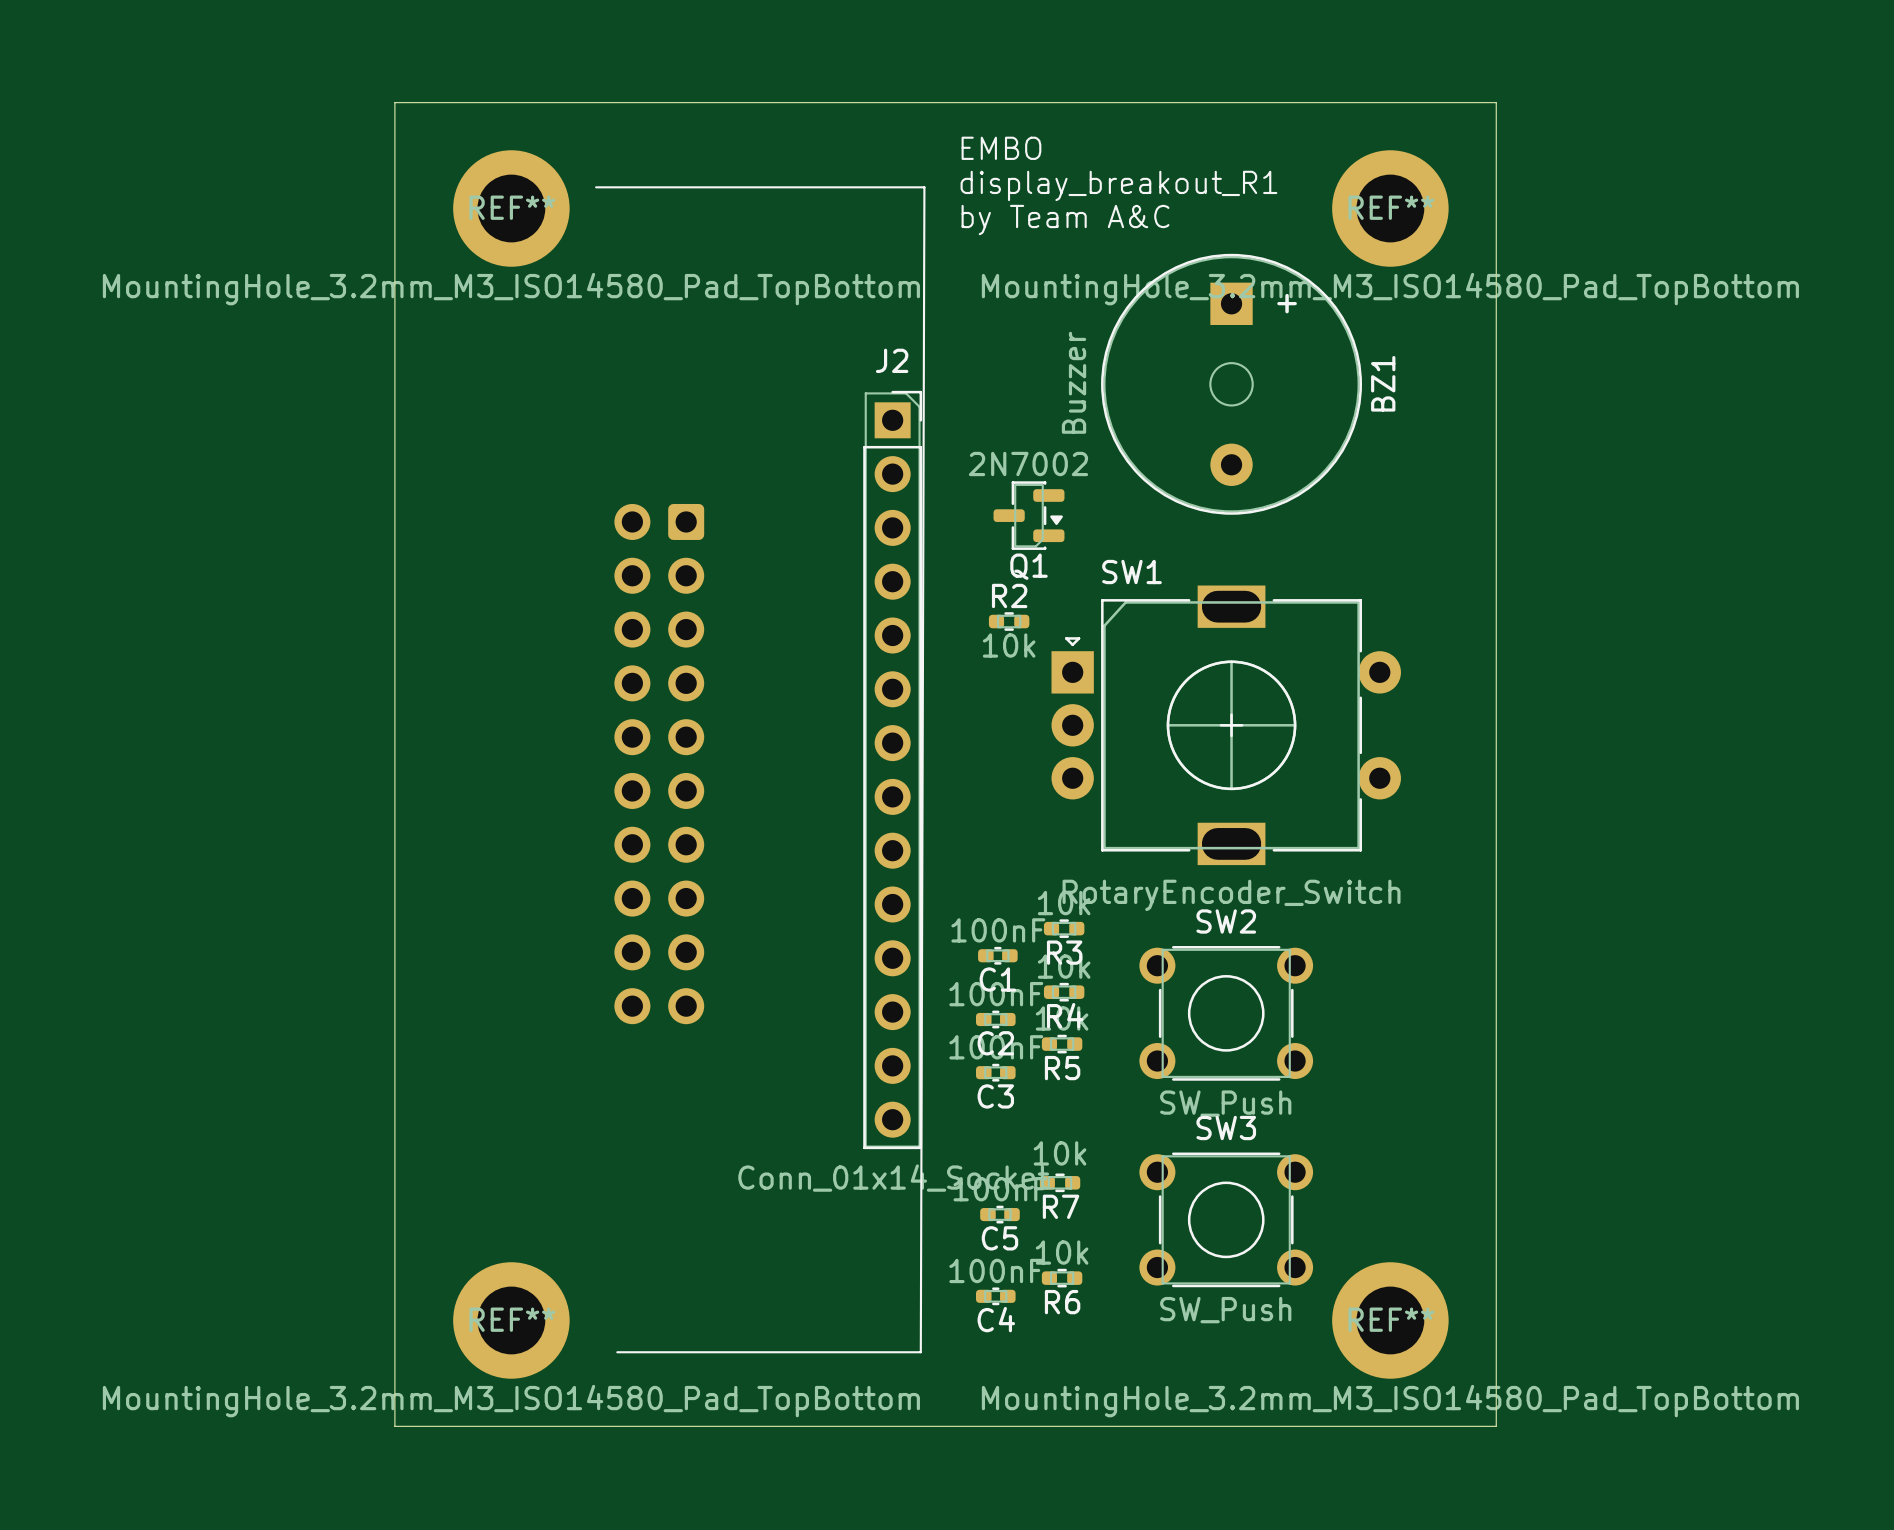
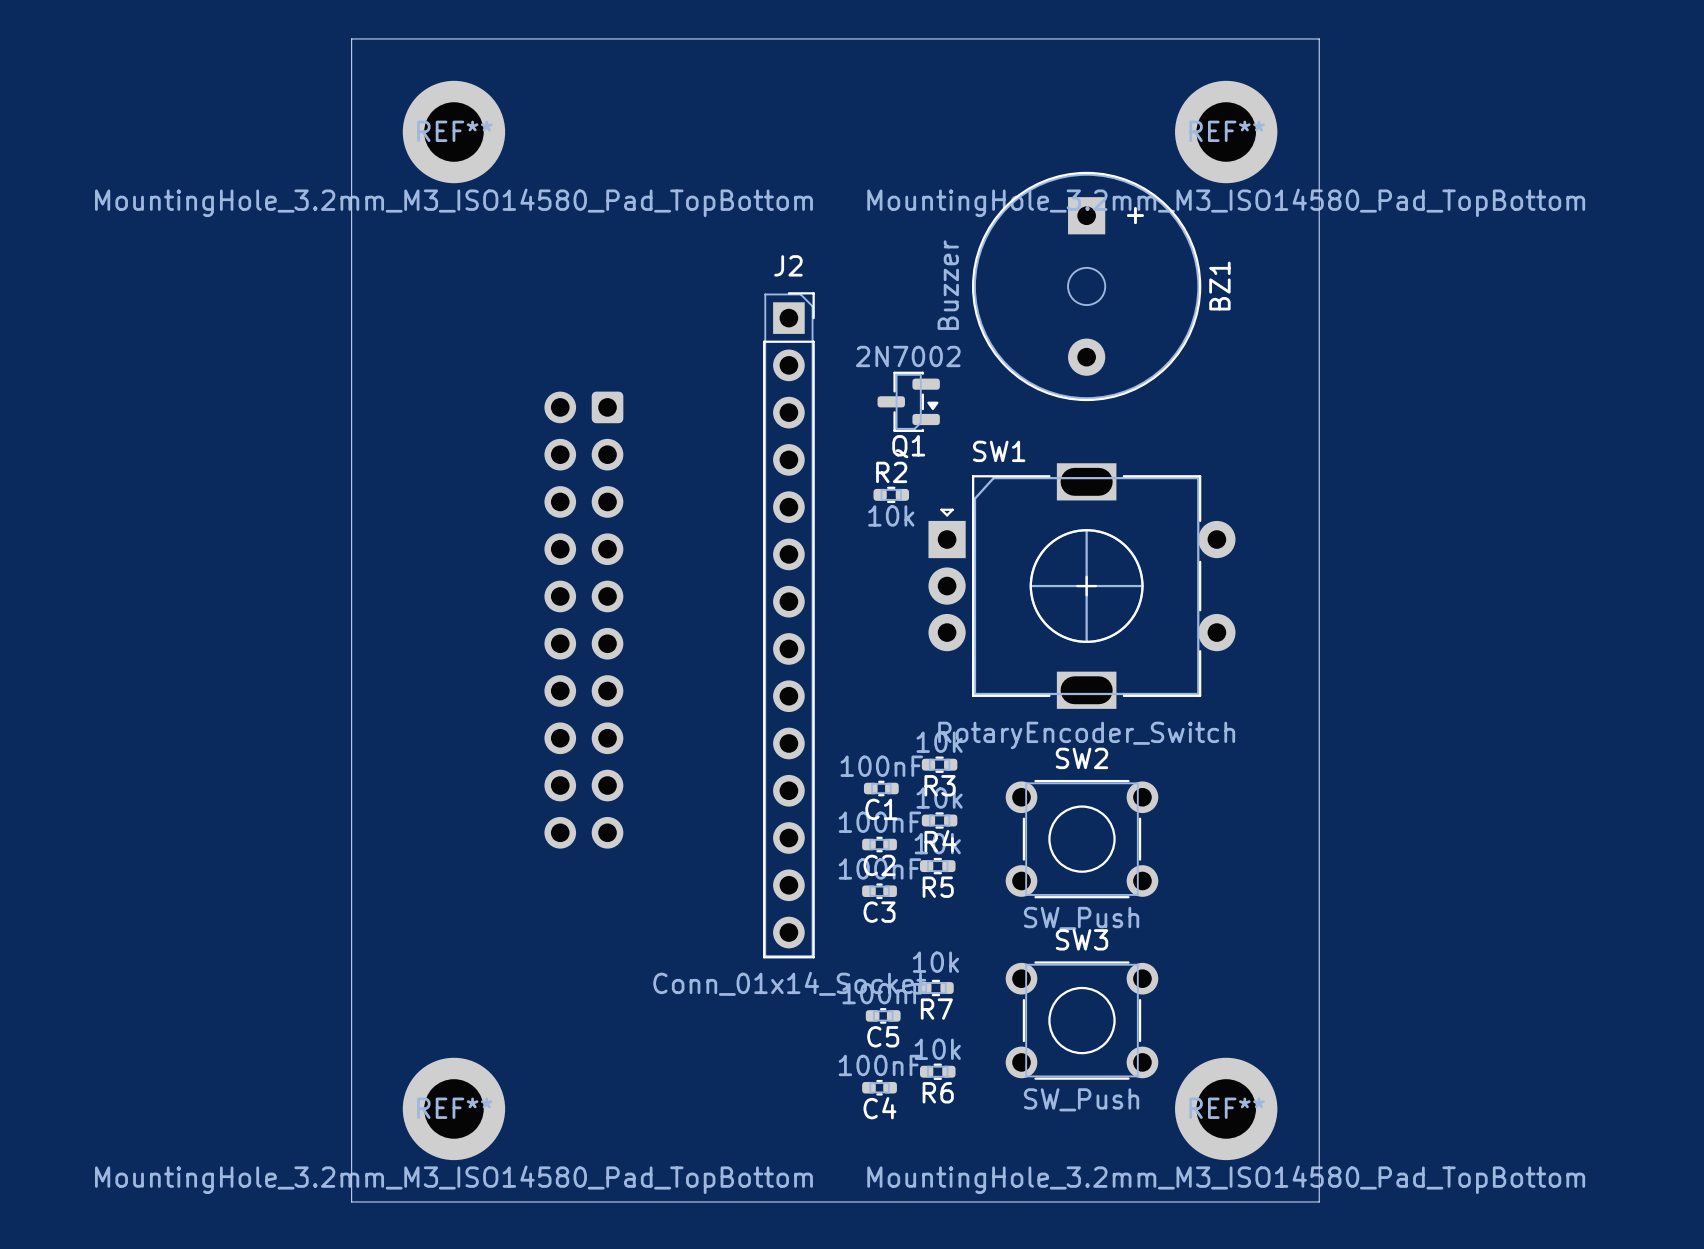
text: EMBO (1001, 148) -> none
text: display_breakout_R1 (1118, 185) -> none
line: (596, 187) (924, 187) (920, 1352) (617, 1352) -> none
text: by Team A&C (1065, 220) -> none

